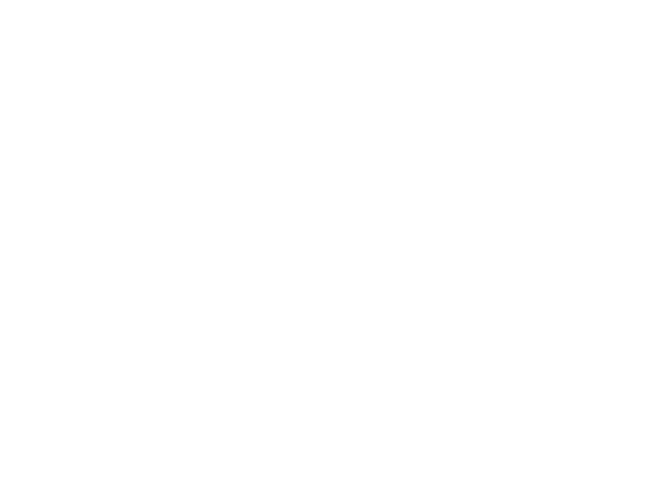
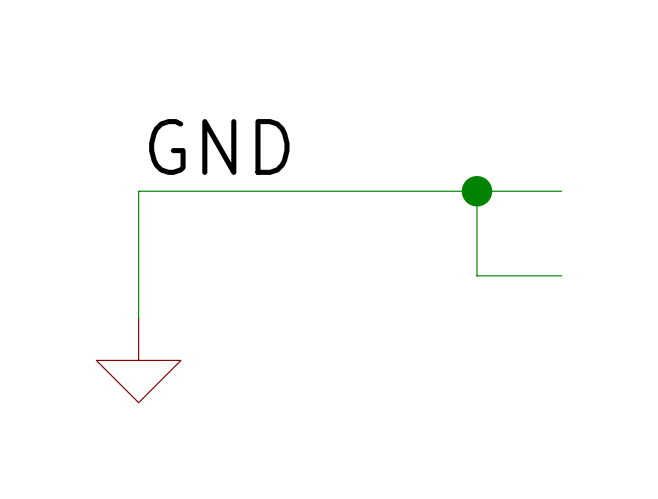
label: none -> GND (219, 146)
wire: none -> (476, 191) (476, 275) (561, 275)
junction: none -> (476, 191)
wire: none -> (561, 191) (138, 191) (138, 318)
power symbol: none -> (138, 360)

